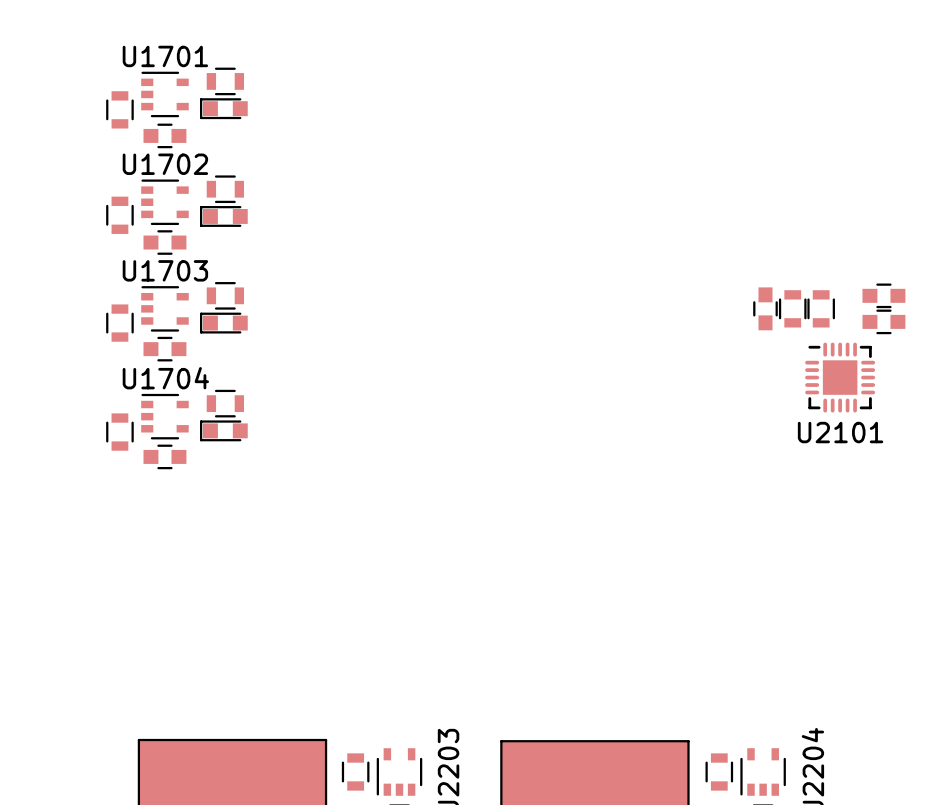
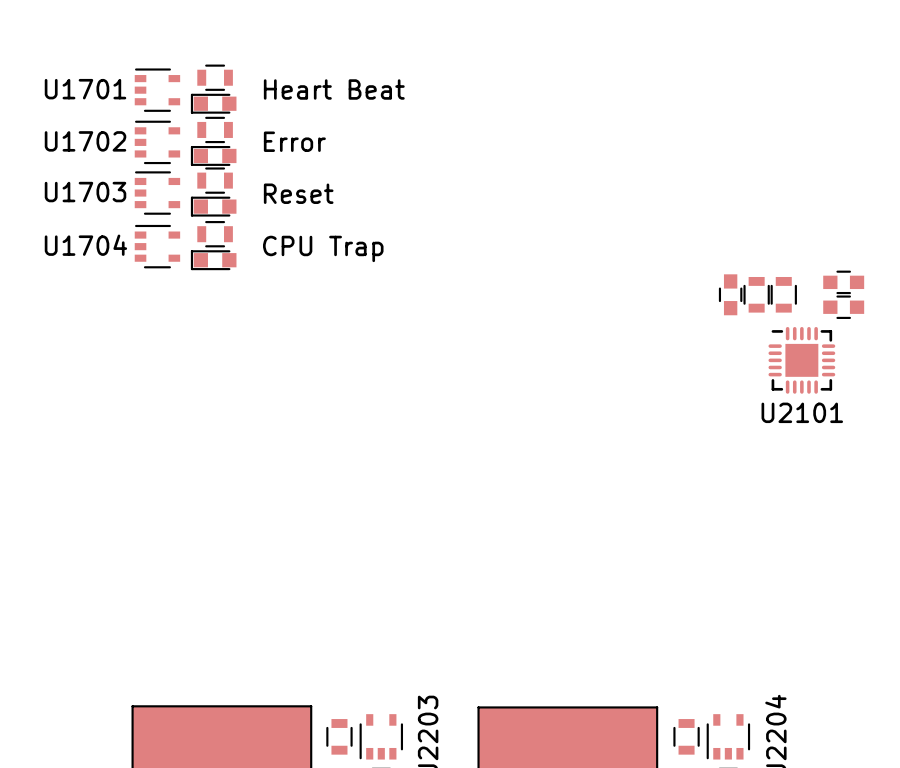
U1701 name position: U1701 (165, 56) -> U1701 (85, 89)
text: none -> Heart Beat (334, 89)
part: (119, 109) -> none
part: (164, 135) -> none
part: none -> (215, 129)
text: none -> Error (294, 141)
U1702: none -> (157, 142)
part: none -> (213, 155)
U1702 name: U1702 (165, 164) -> U1703 (85, 192)
text: none -> Reset (298, 193)
part: (119, 215) -> none
part: (164, 242) -> none
text: none -> CPU Trap (323, 248)
part position: (225, 295) -> (215, 234)
U1703: (164, 308) -> none
part: (119, 323) -> none
part position: (223, 323) -> (213, 260)
part: (164, 349) -> none
U1704 name position: U1704 (165, 378) -> U1704 (85, 245)
part: (225, 403) -> none
U1704 position: (164, 416) -> (157, 246)
part: (223, 430) -> none
part: (119, 432) -> none
part: (164, 456) -> none

